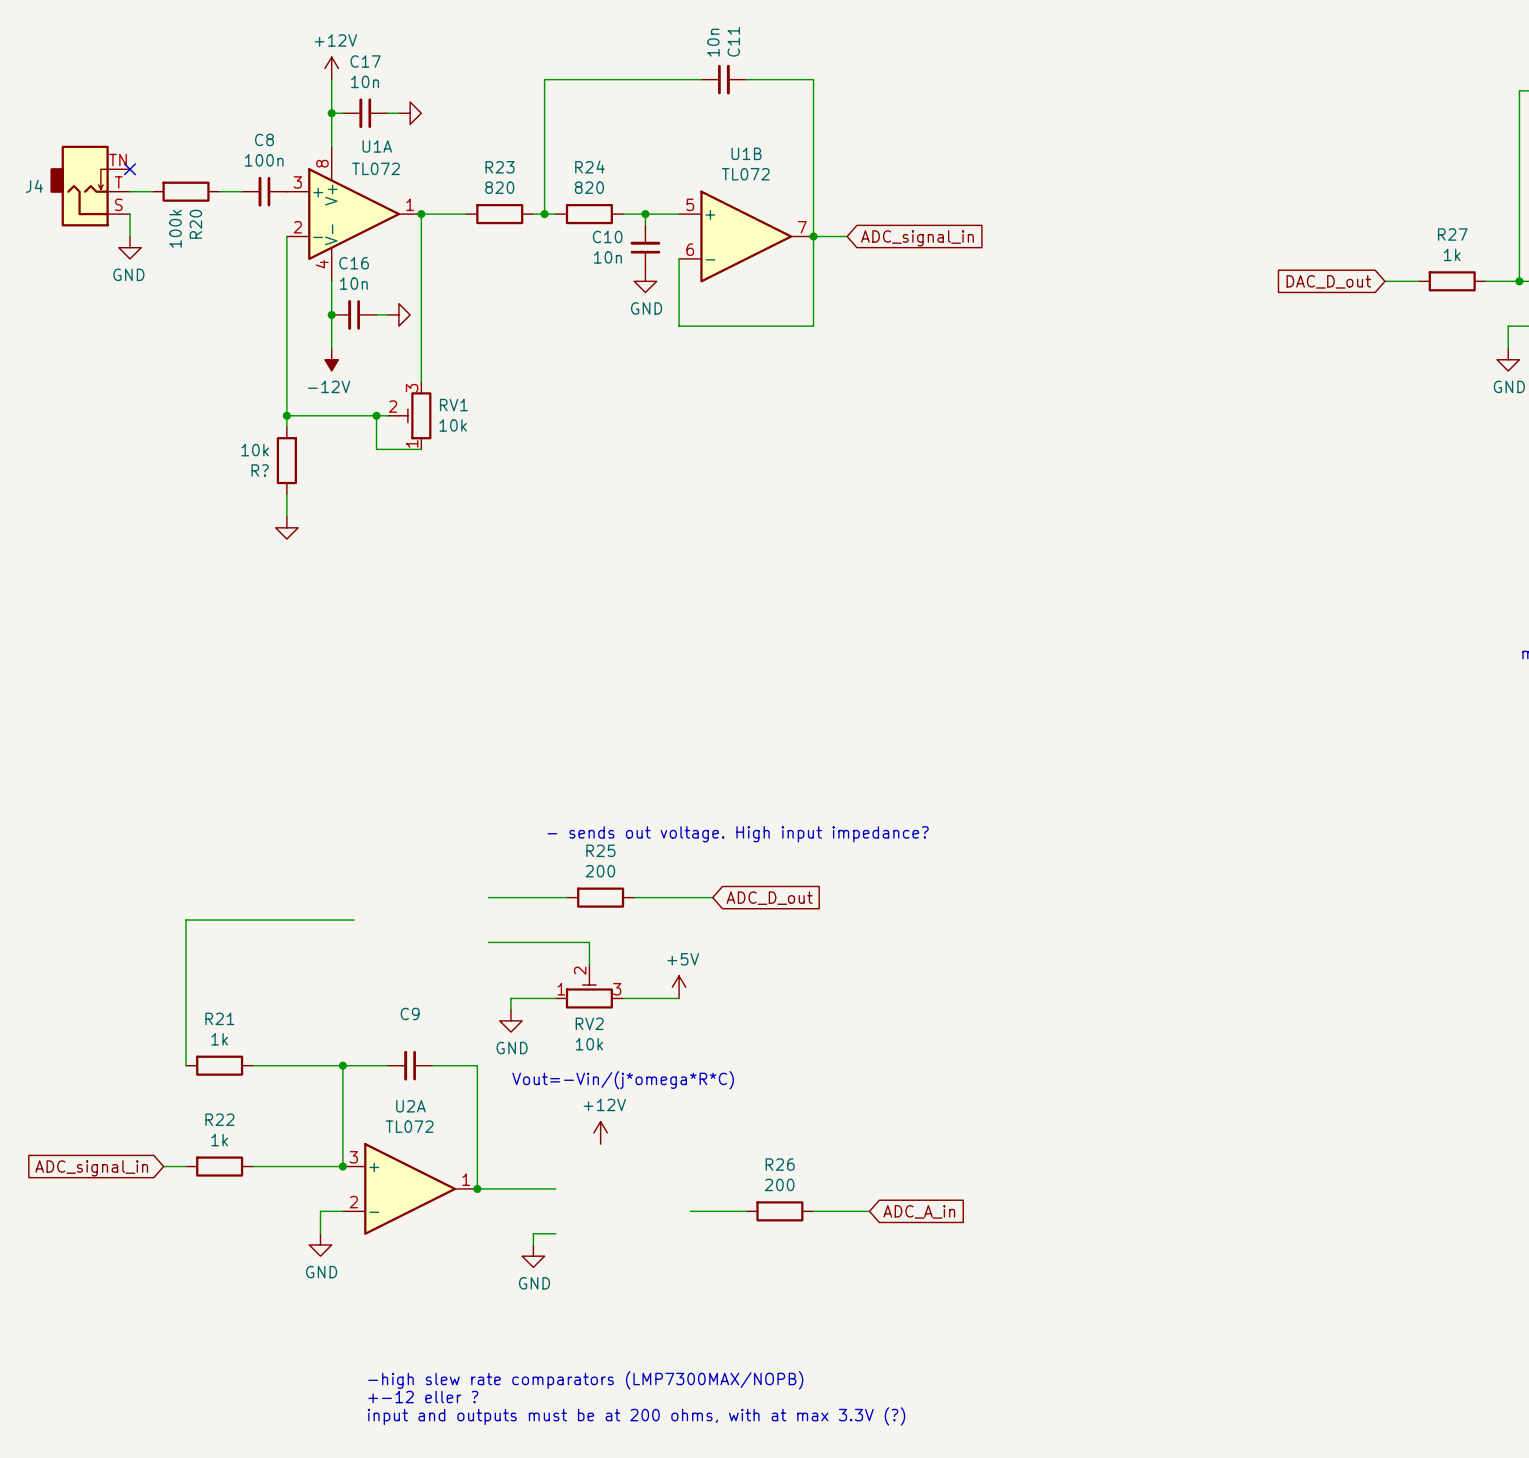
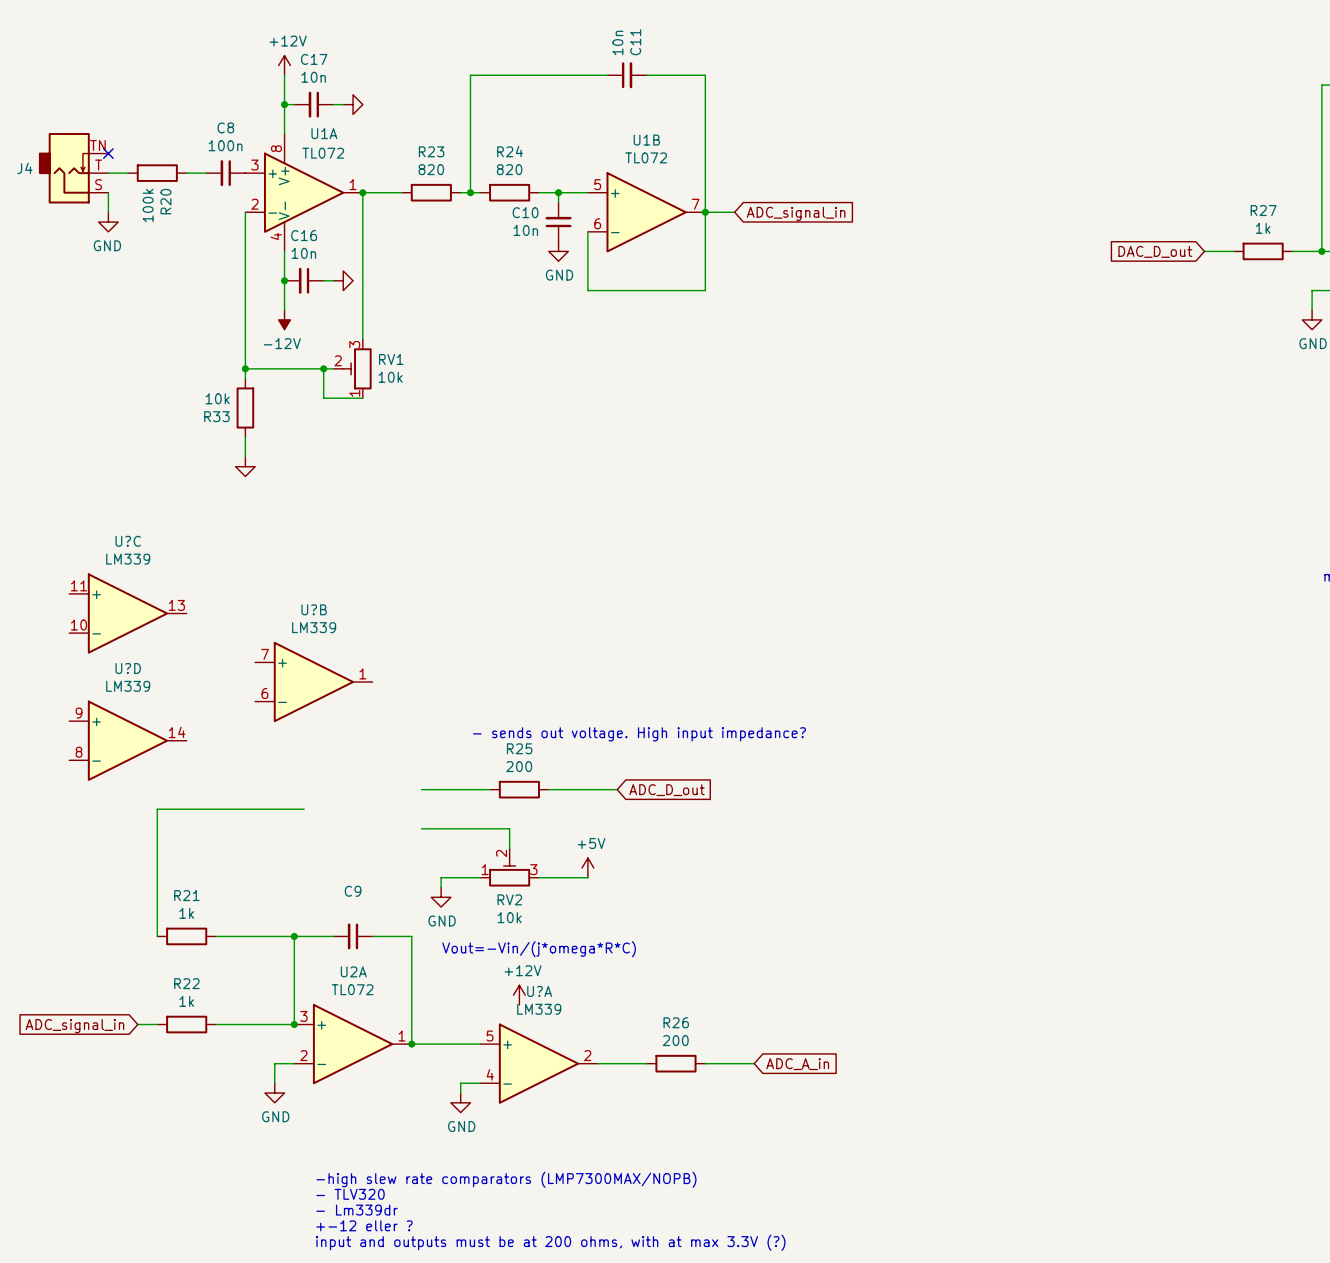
R? name: R? (260, 470) -> R33 (216, 416)
U?C: none -> LM339 (127, 613)
U?B: none -> LM339 (313, 682)
U?D: none -> LM339 (127, 740)
U?A: none -> LM339 (538, 1063)
text: none -> -high slew rate comparators (LMP7300MAX/NOPB) (506, 1179)
text: none -> - TLV320 (350, 1194)
text: -high slew rate comparators (LMP7300MAX/NOPB) (585, 1380) -> - Lm339dr (357, 1210)

